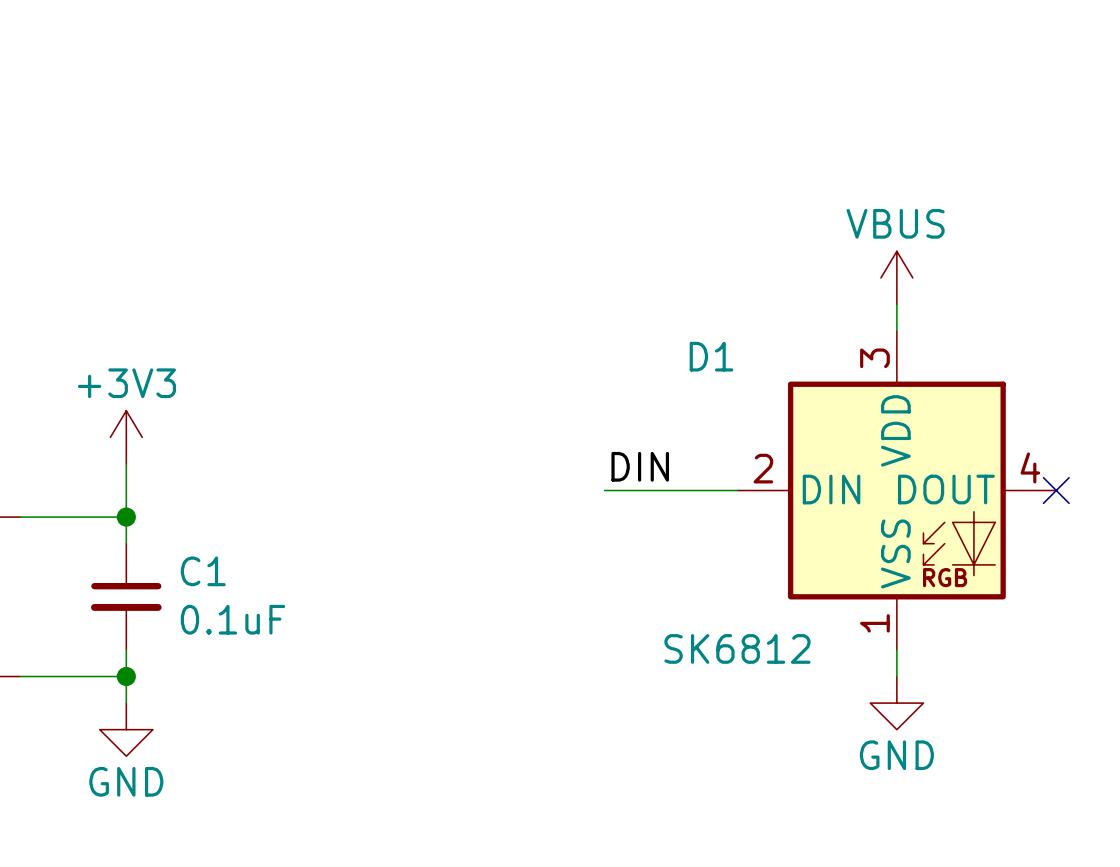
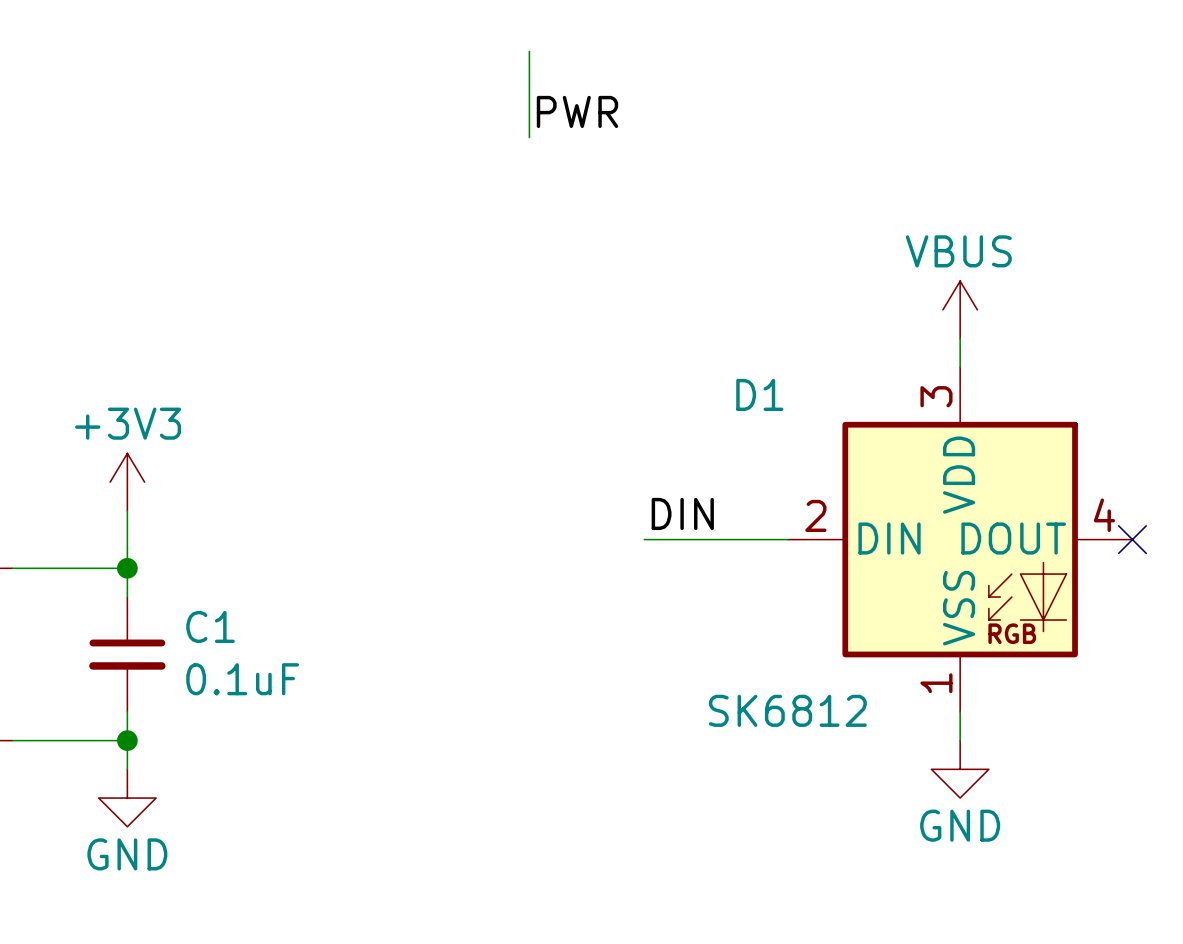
wire: none -> (529, 51) (529, 137)
label: none -> PWR (577, 111)

